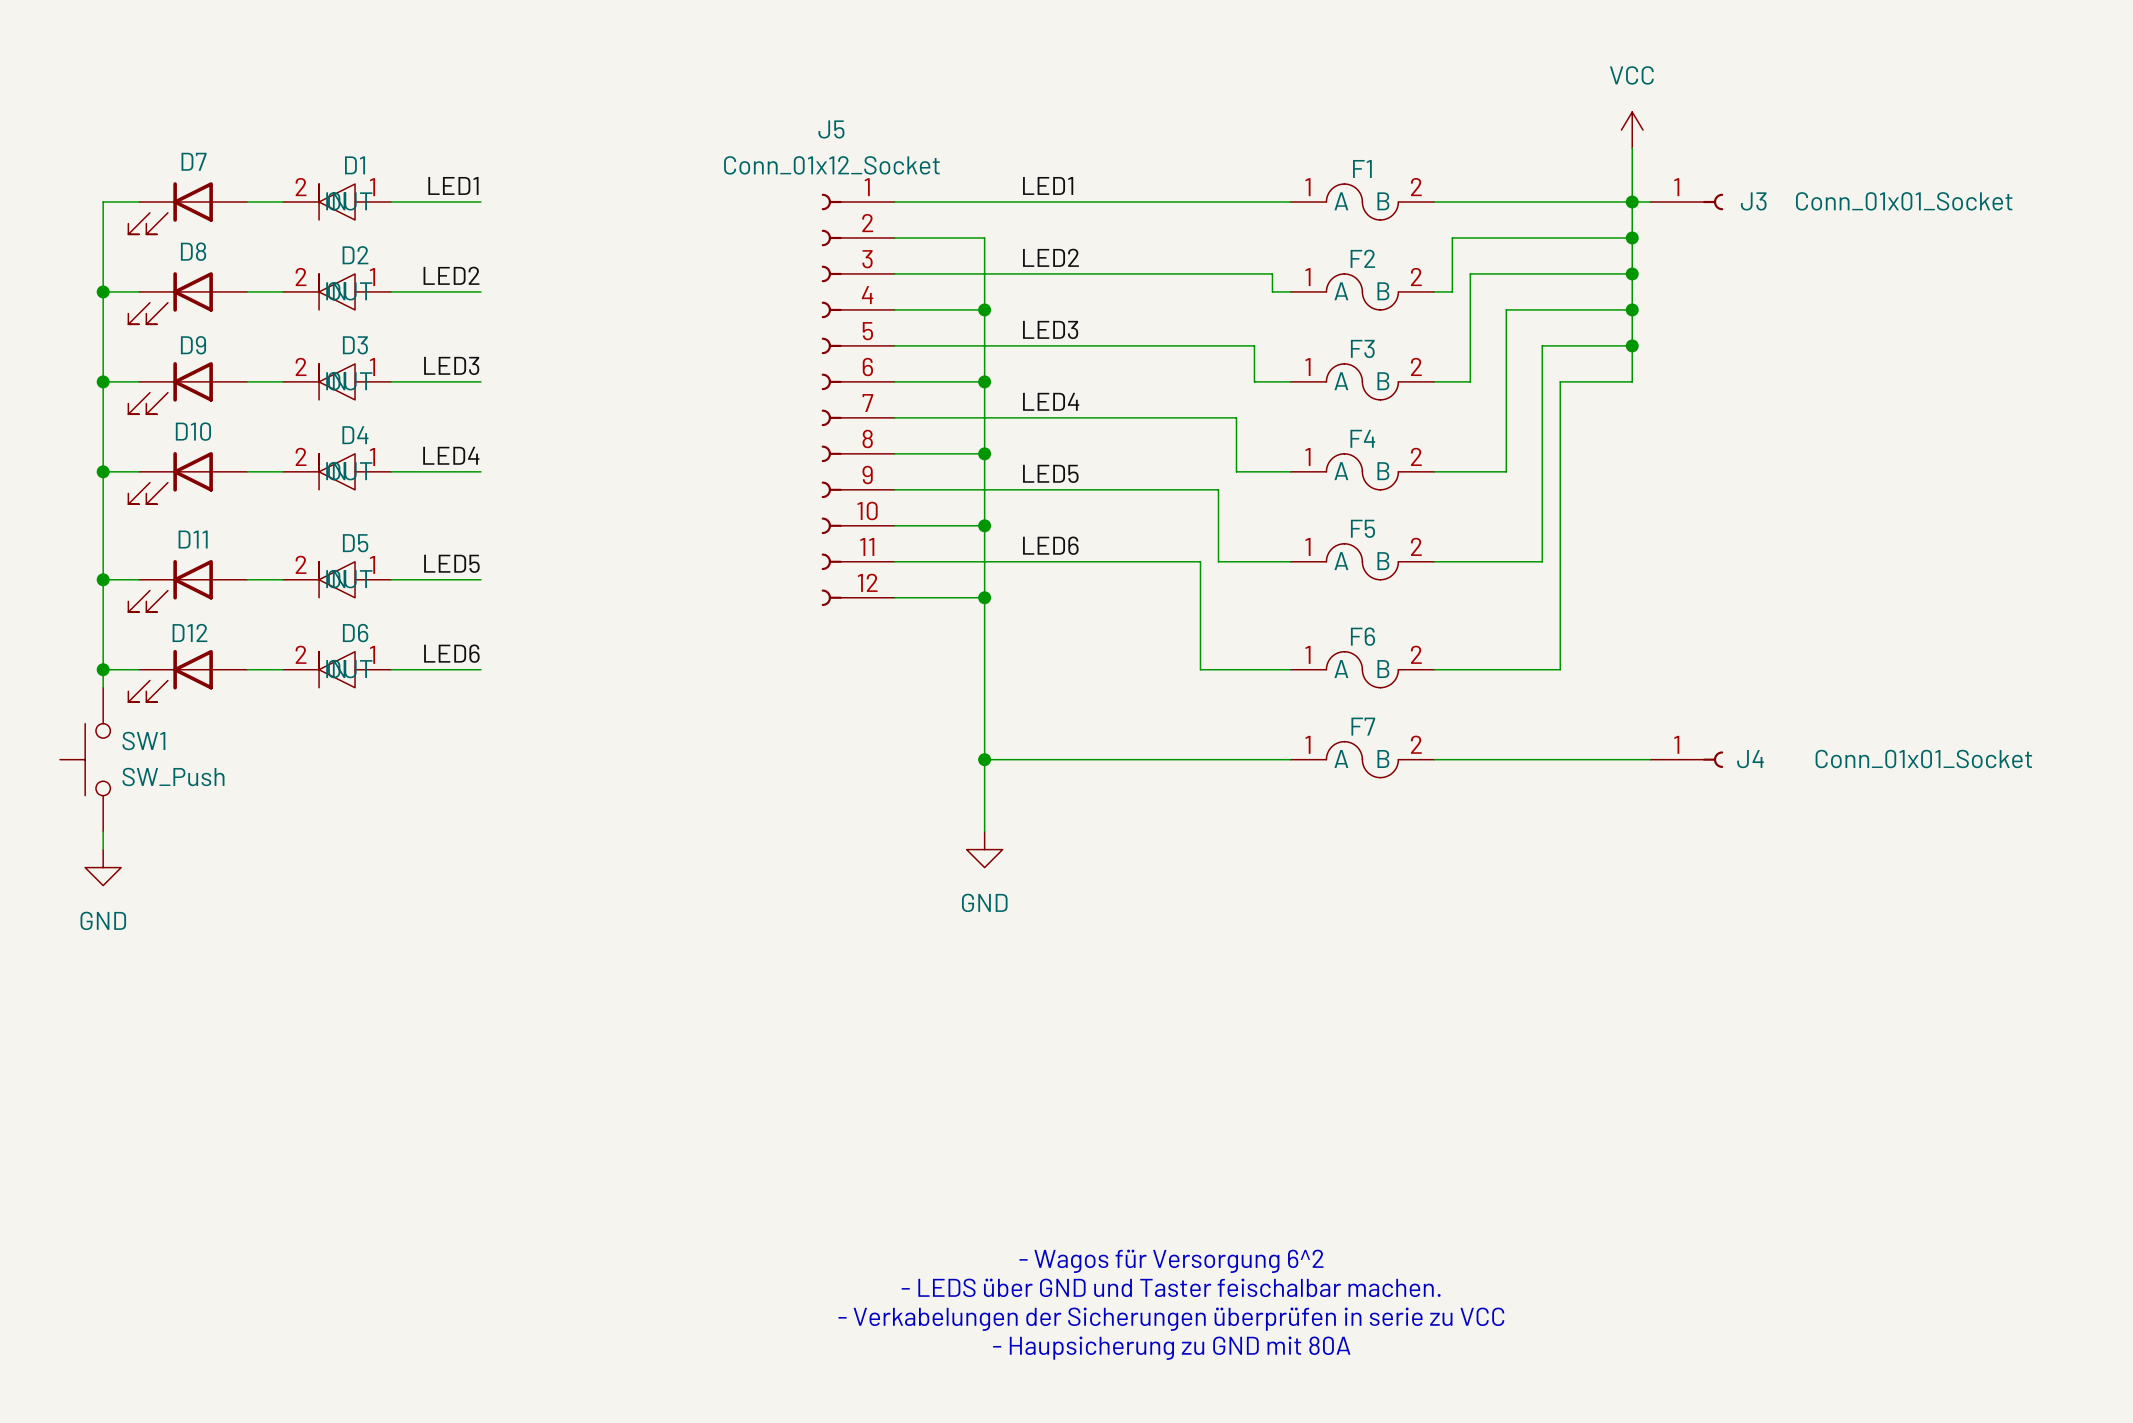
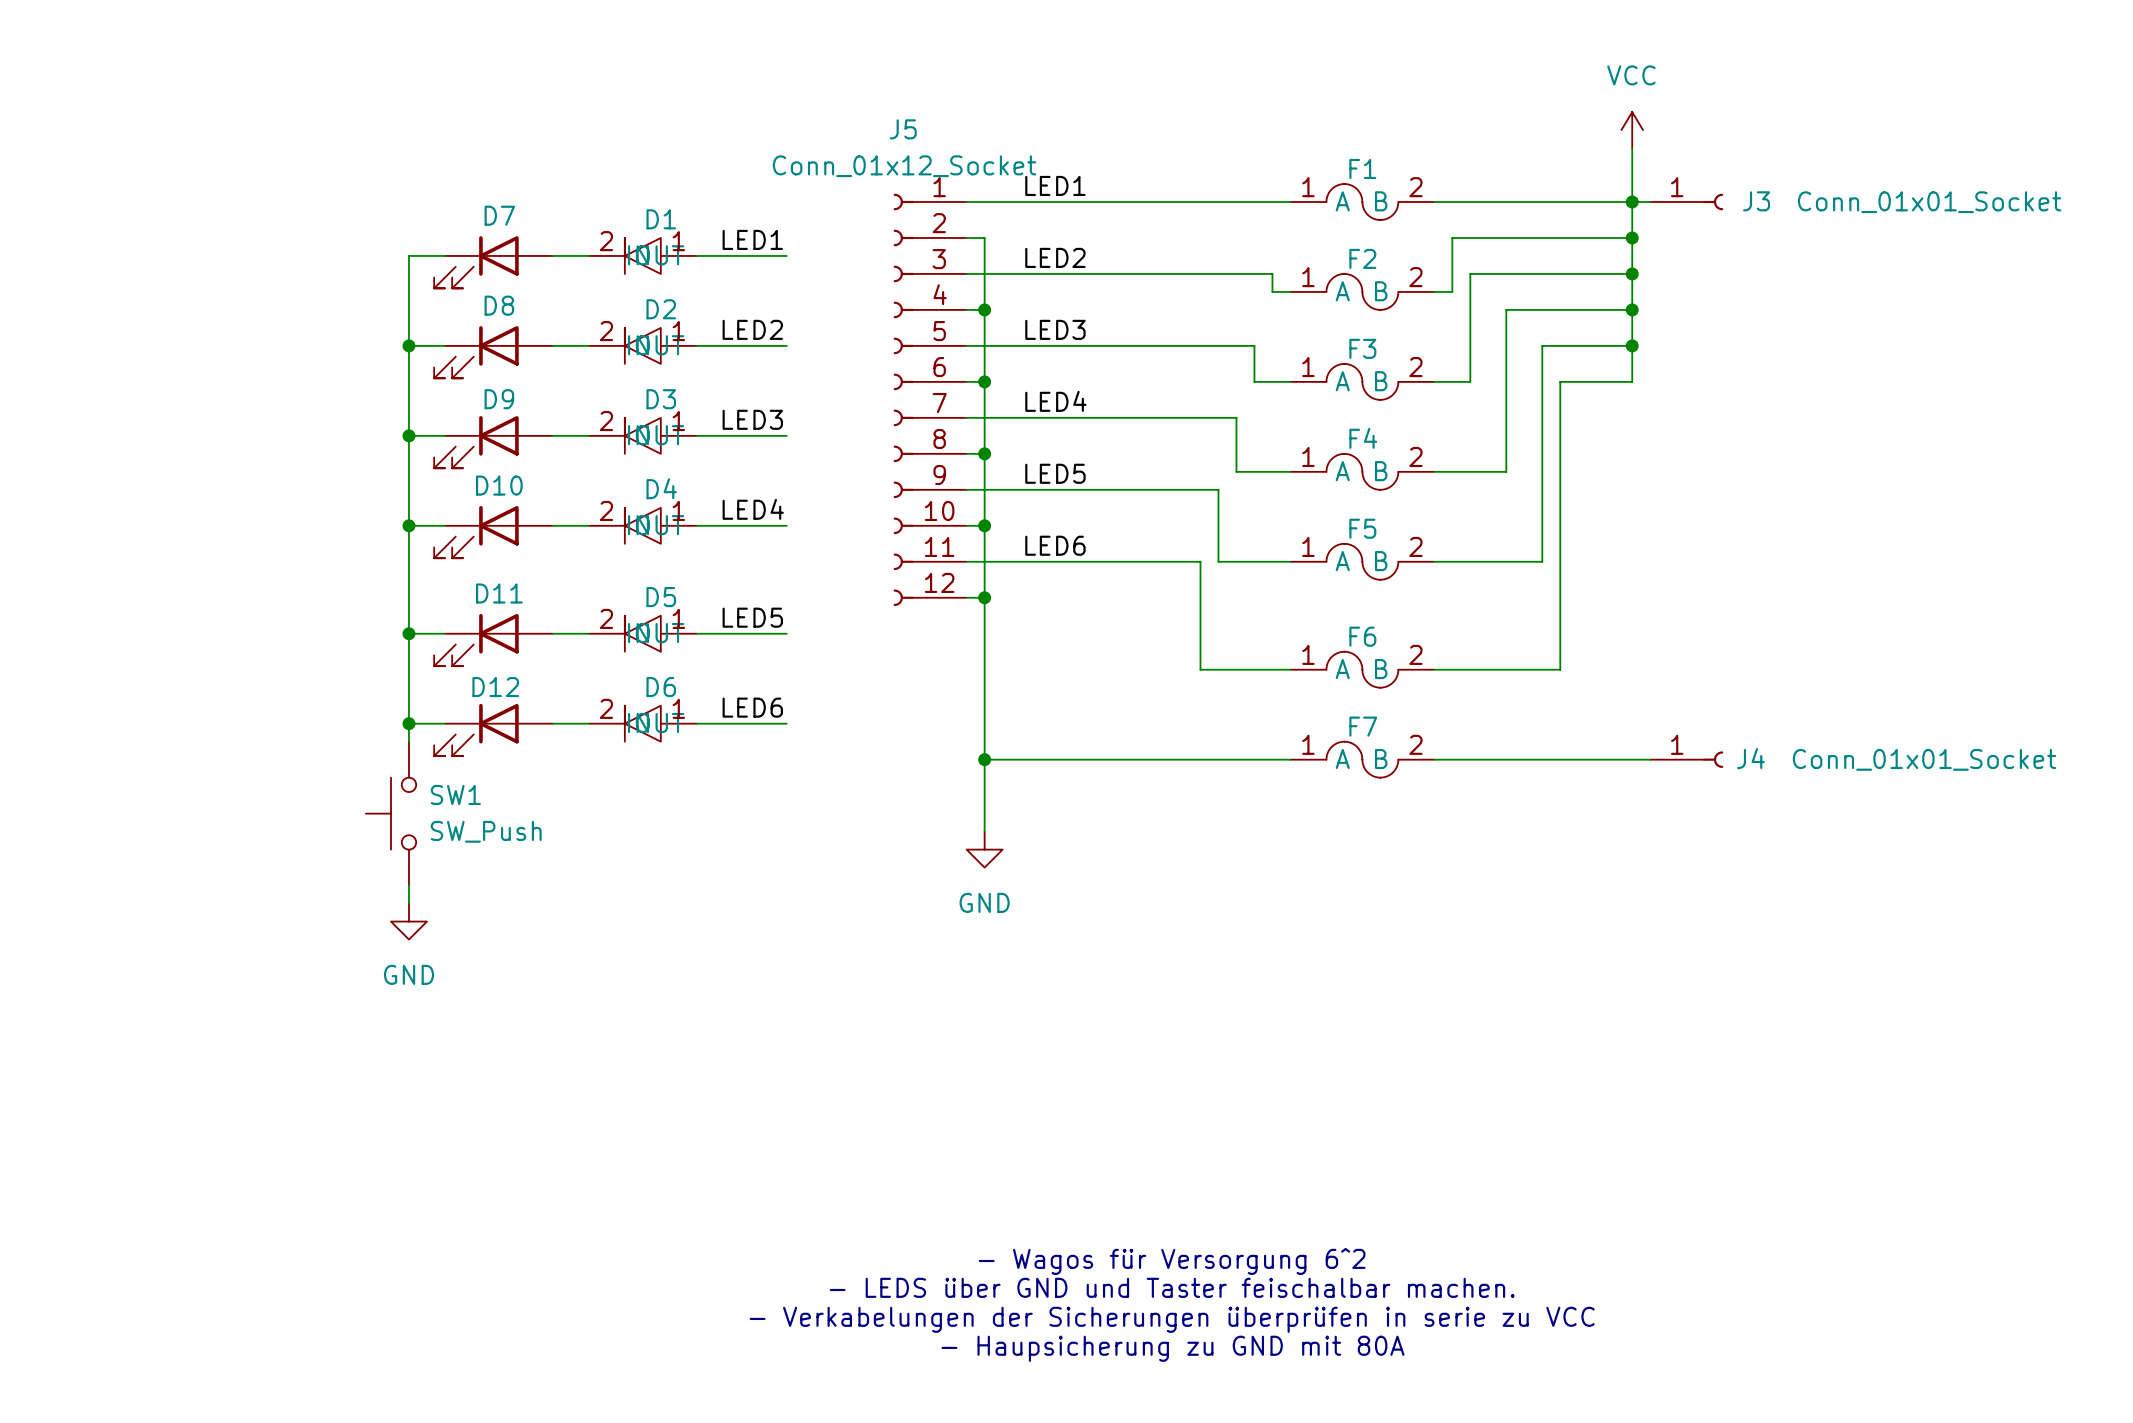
label position: LED1 (453, 185) -> LED1 (752, 239)
wire: (139, 202) (103, 202) (103, 687) -> (444, 255) (408, 255) (408, 741)
wire: (247, 202) (283, 202) -> (552, 255) (588, 255)
D1 position: (337, 202) -> (642, 255)
wire: (390, 202) (480, 202) -> (696, 255) (786, 255)
D7 position: (187, 208) -> (493, 262)
label position: LED2 (451, 275) -> LED2 (752, 329)
wire: (103, 291) (139, 291) -> (408, 345) (444, 345)
junction: (103, 291) -> none
wire: (247, 291) (283, 291) -> (552, 345) (588, 345)
D2 position: (337, 291) -> (642, 345)
wire: (390, 291) (480, 291) -> (696, 345) (786, 345)
D8 position: (187, 298) -> (493, 352)
junction: none -> (408, 345)
label position: LED3 (451, 365) -> LED3 (752, 419)
wire: (103, 381) (139, 381) -> (408, 435) (444, 435)
junction: (103, 381) -> none
wire: (247, 381) (283, 381) -> (552, 435) (588, 435)
D3 position: (337, 381) -> (642, 435)
wire: (390, 381) (480, 381) -> (696, 435) (786, 435)
D9 position: (187, 388) -> (493, 442)
J5 position: (858, 399) -> (930, 399)
junction: none -> (408, 435)
label position: LED4 (451, 455) -> LED4 (753, 509)
wire: (103, 471) (139, 471) -> (408, 525) (444, 525)
junction: (103, 471) -> none
wire: (247, 471) (283, 471) -> (552, 525) (588, 525)
D4 position: (337, 471) -> (642, 525)
wire: (390, 471) (480, 471) -> (696, 525) (786, 525)
D10 position: (187, 478) -> (493, 532)
junction: none -> (408, 525)
label position: LED5 (451, 563) -> LED5 (752, 617)
wire: (103, 579) (139, 579) -> (408, 633) (444, 633)
junction: (103, 579) -> none
wire: (247, 579) (283, 579) -> (552, 633) (588, 633)
D5 position: (337, 579) -> (642, 633)
wire: (390, 579) (480, 579) -> (696, 633) (786, 633)
D11 position: (187, 586) -> (493, 640)
junction: none -> (408, 633)
label position: LED6 (451, 653) -> LED6 (752, 707)
wire: (103, 669) (139, 669) -> (408, 723) (444, 723)
junction: (103, 669) -> none
wire: (247, 669) (283, 669) -> (552, 723) (588, 723)
D6 position: (337, 669) -> (642, 723)
wire: (390, 669) (480, 669) -> (696, 723) (786, 723)
D12 position: (187, 676) -> (493, 729)
junction: none -> (408, 723)
SW1 position: (85, 759) -> (390, 813)
wire: (103, 831) (103, 849) -> (408, 885) (408, 903)
power symbol position: GND (103, 867) -> GND (408, 921)

